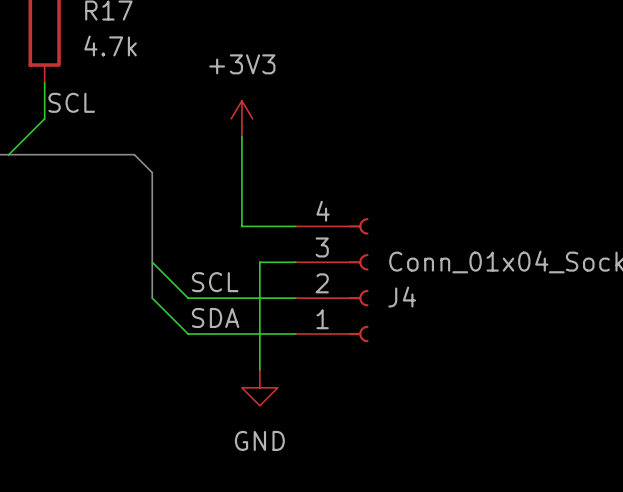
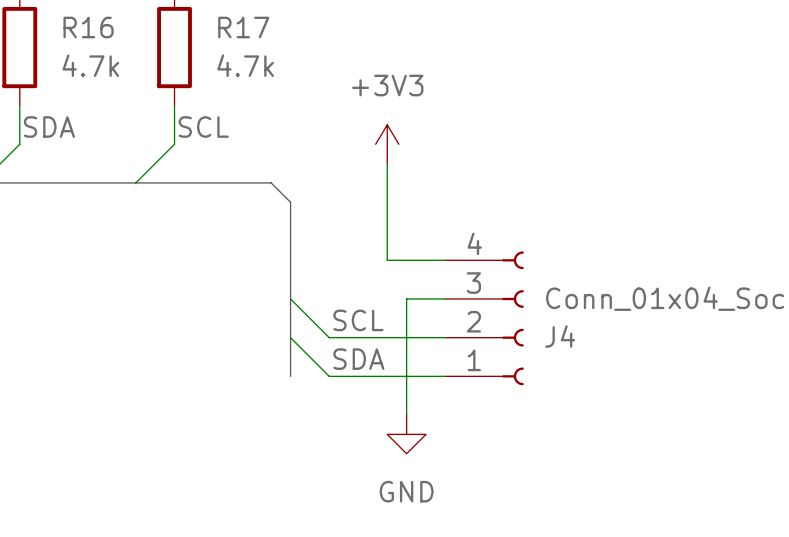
bus: none -> (290, 337) (290, 376)

